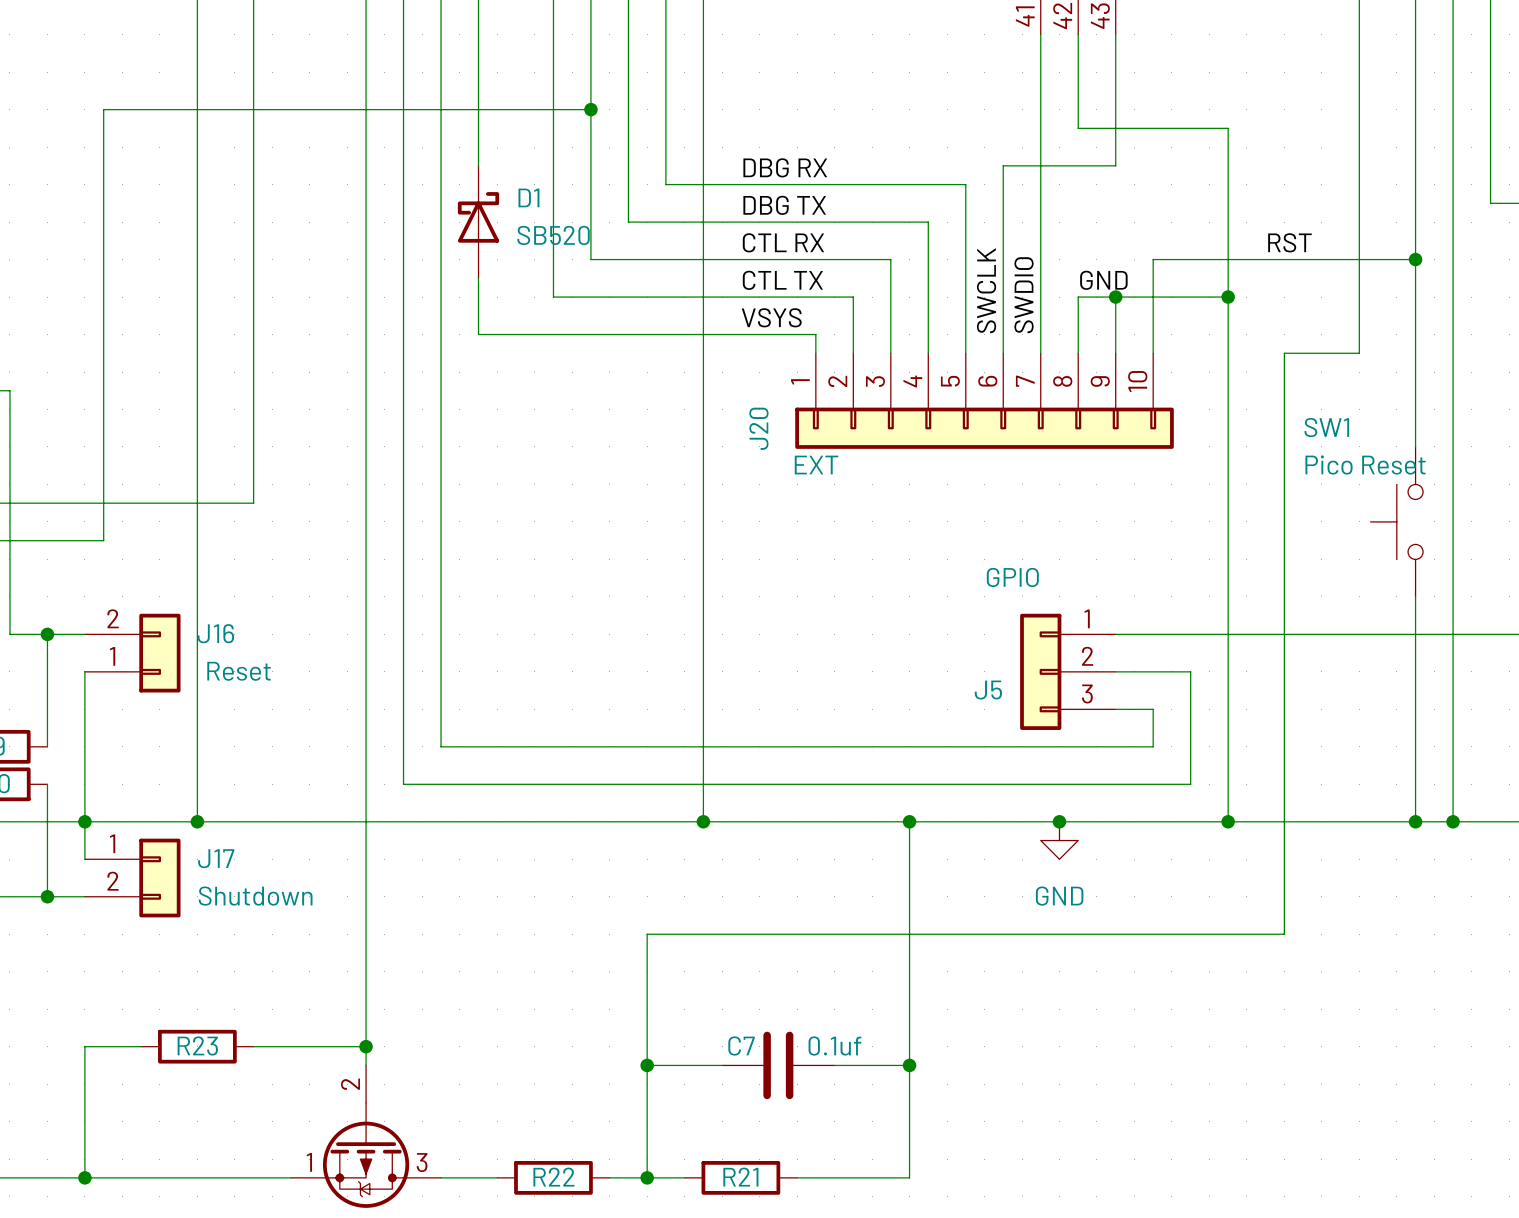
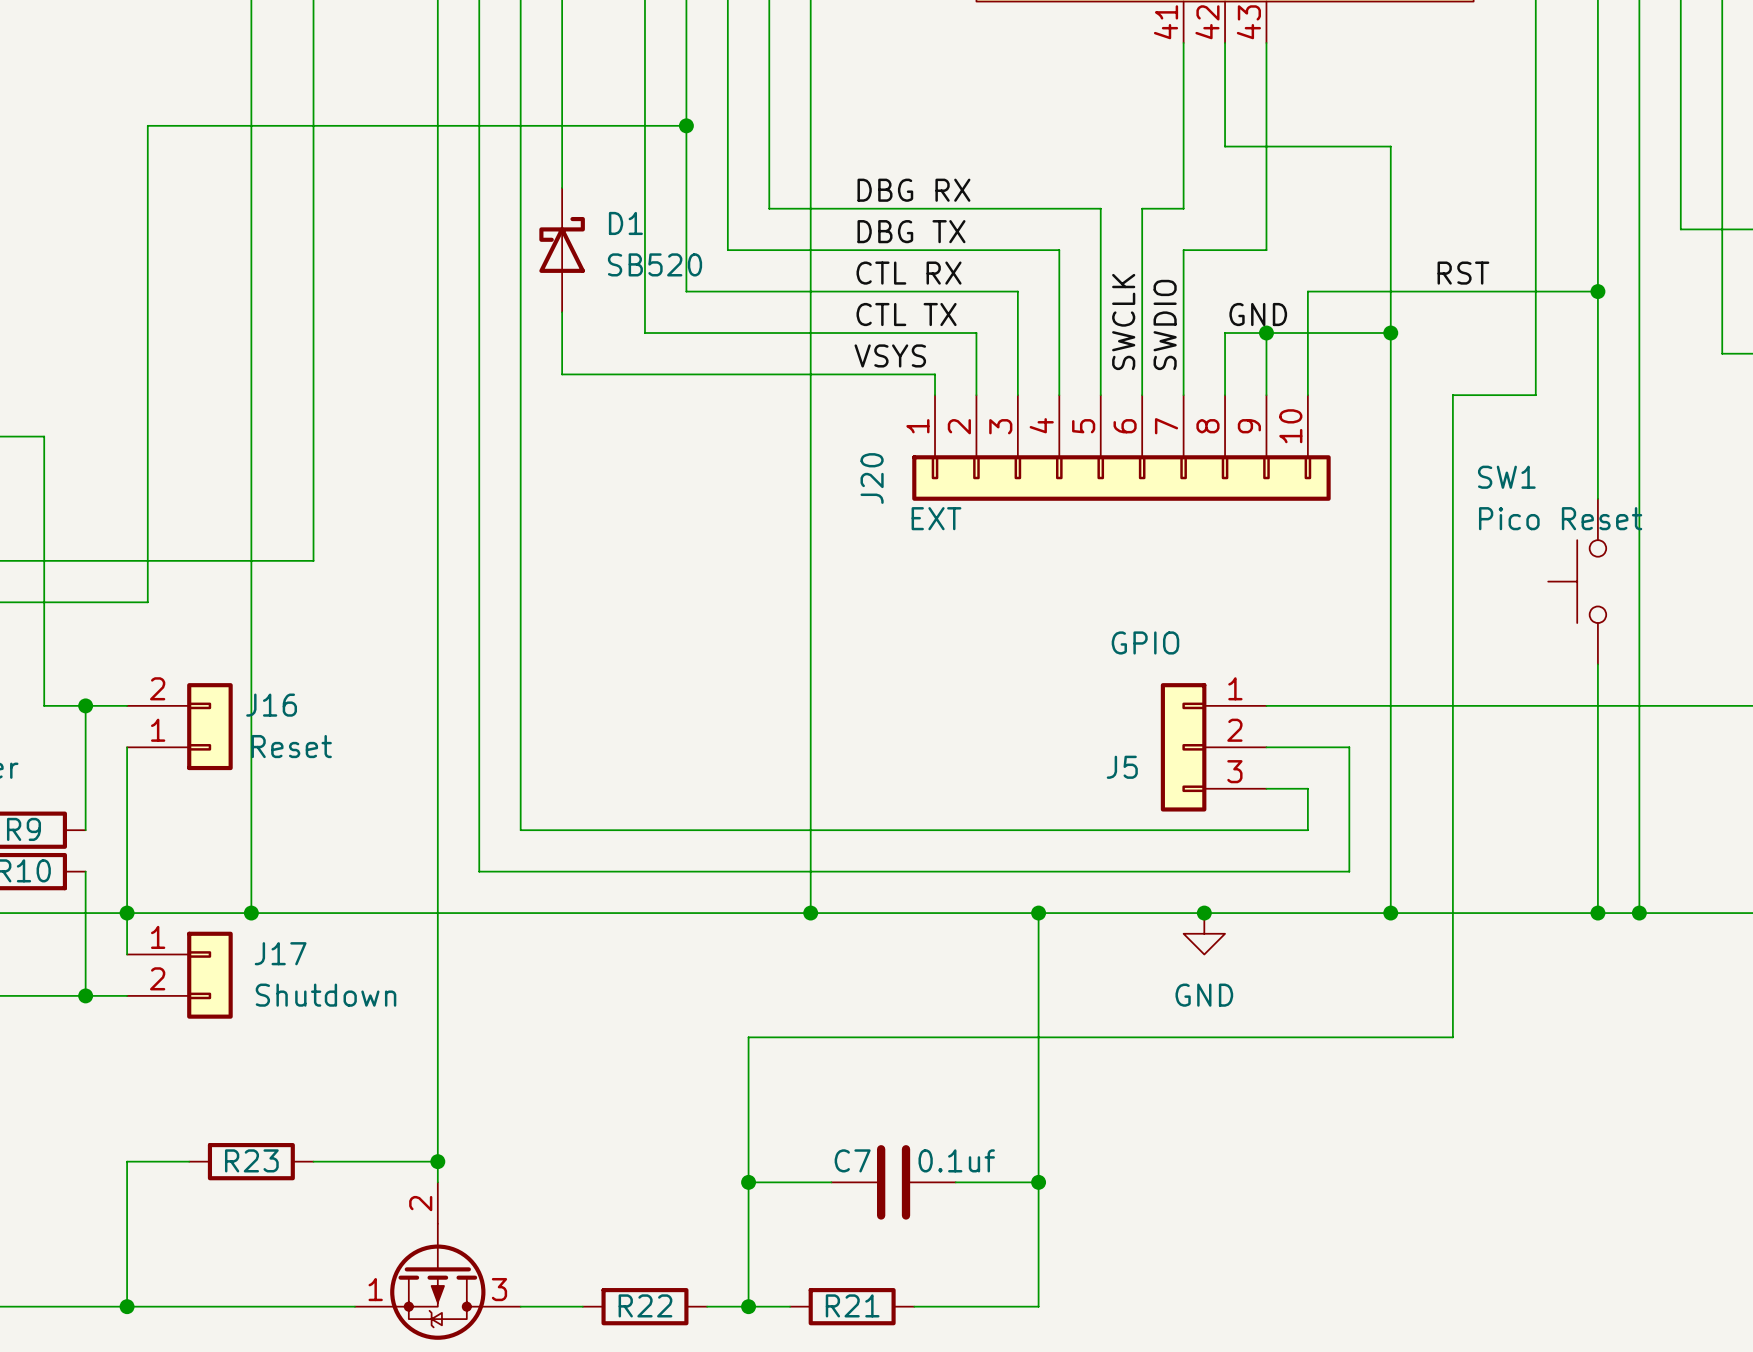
wire: (1115, 165) (1003, 165) (1003, 184) -> (1266, 187) (1266, 250) (1183, 250)
wire: (1040, 184) (1040, 222) -> (1183, 208) (1142, 208)

